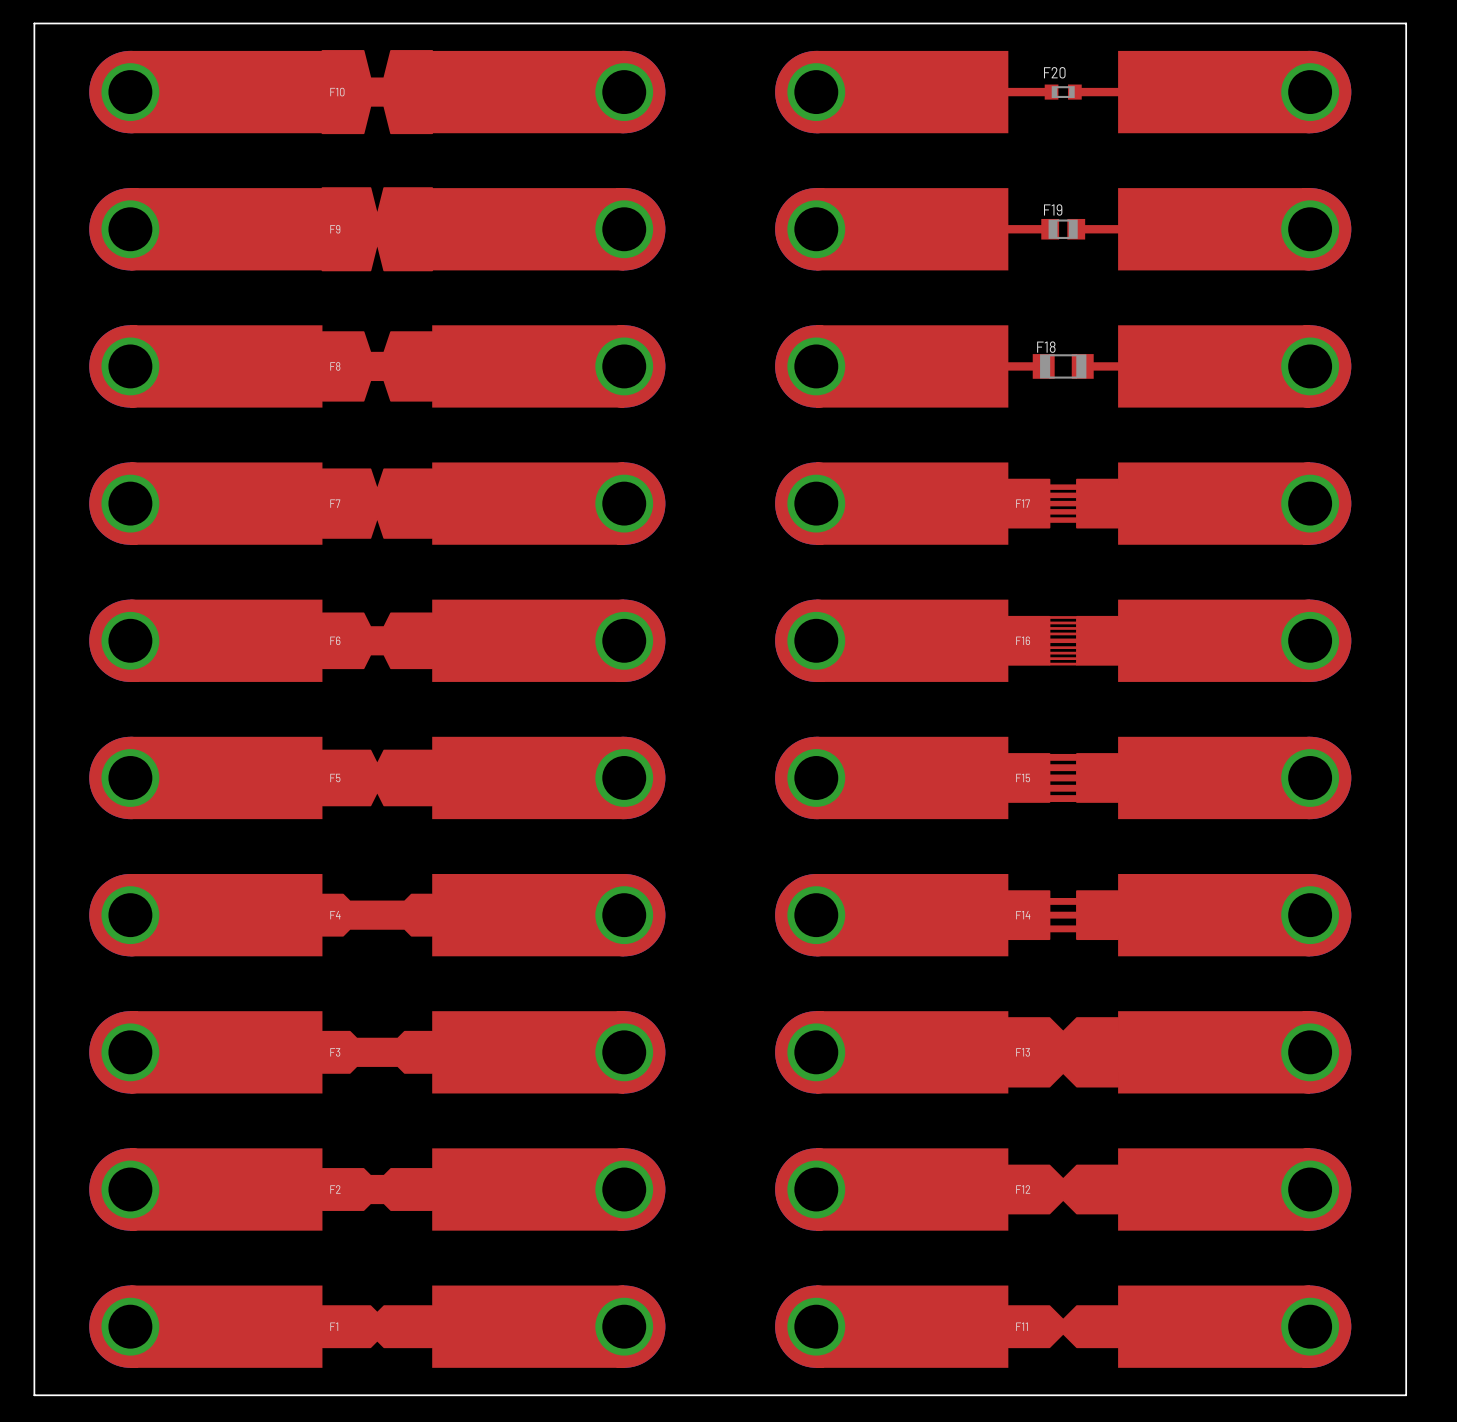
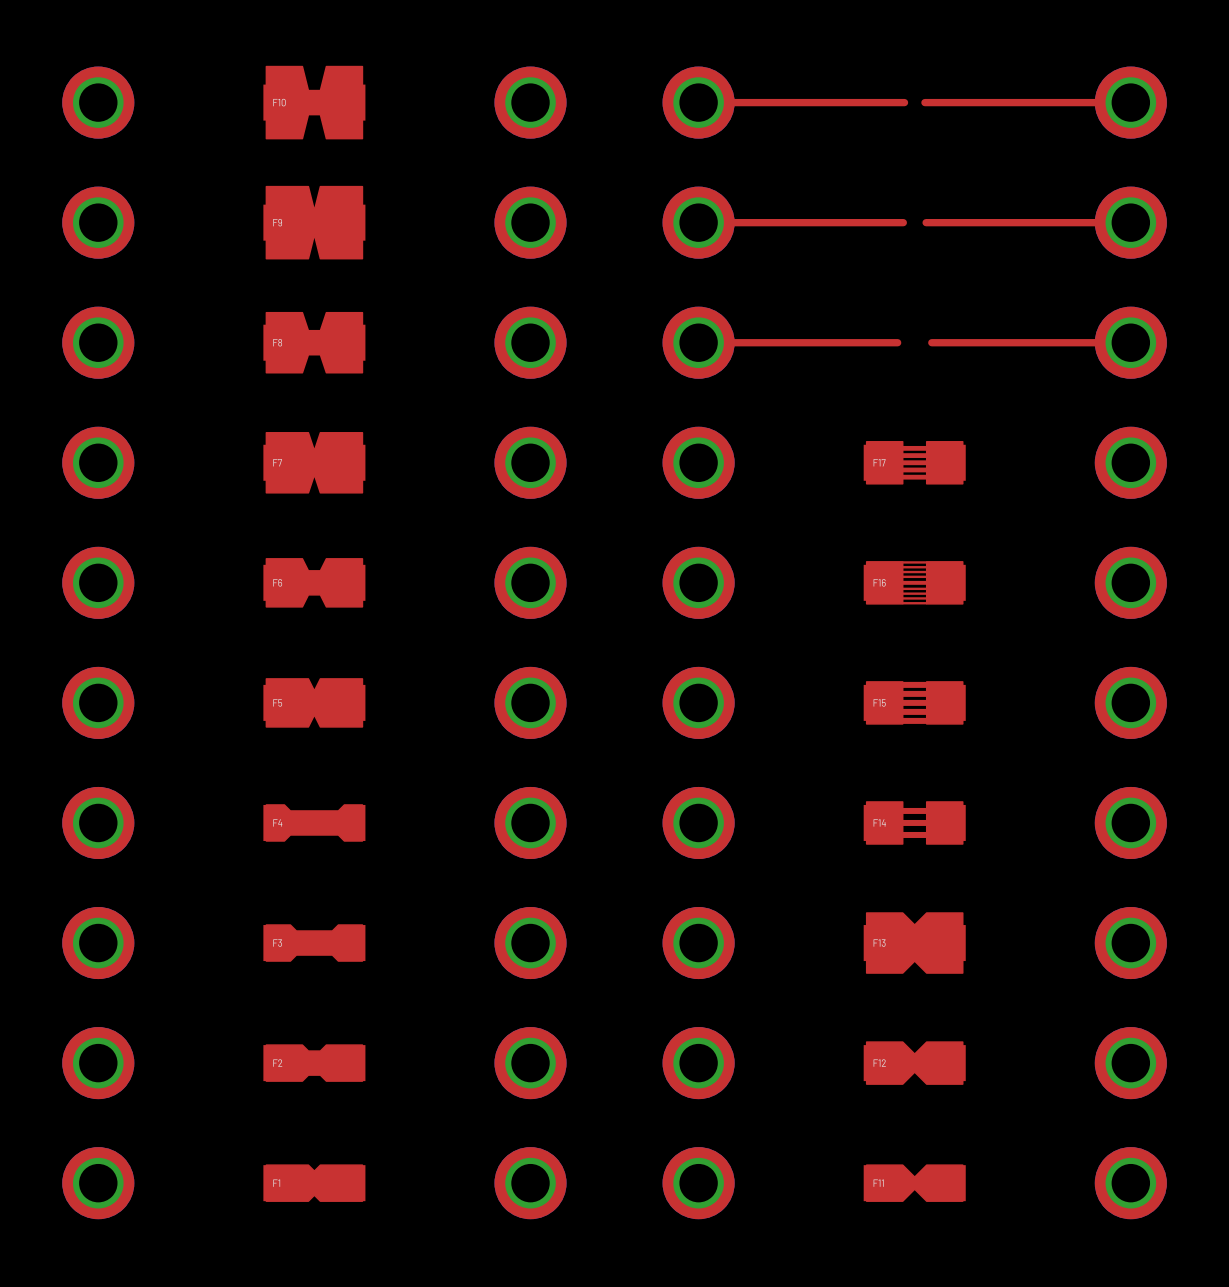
board edge: (34, 23) (1406, 23) (1406, 1395) (34, 1395) (34, 23) -> none
drawing: [130, 50, 323, 134] -> none
drawing: [432, 50, 625, 134] -> none
drawing: [816, 50, 1009, 134] -> none
drawing: [1118, 50, 1311, 134] -> none
F20: (1063, 92) -> none
drawing: [130, 188, 323, 271] -> none
drawing: [432, 188, 625, 271] -> none
drawing: [816, 188, 1009, 271] -> none
drawing: [1118, 188, 1311, 271] -> none
F19: (1063, 229) -> none
drawing: [130, 325, 323, 408] -> none
drawing: [432, 325, 625, 408] -> none
drawing: [816, 325, 1009, 408] -> none
drawing: [1118, 325, 1311, 408] -> none
F18: (1063, 366) -> none
drawing: [130, 462, 323, 545] -> none
drawing: [432, 462, 625, 545] -> none
drawing: [816, 462, 1009, 545] -> none
drawing: [1118, 462, 1311, 545] -> none
drawing: [130, 599, 323, 682] -> none
drawing: [432, 599, 625, 682] -> none
drawing: [816, 599, 1009, 682] -> none
drawing: [1118, 599, 1311, 682] -> none
drawing: [130, 736, 323, 820] -> none
drawing: [432, 736, 625, 820] -> none
drawing: [816, 736, 1009, 820] -> none
drawing: [1118, 736, 1311, 820] -> none
drawing: [130, 873, 323, 957] -> none
drawing: [432, 873, 625, 957] -> none
drawing: [816, 873, 1009, 957] -> none
drawing: [1118, 873, 1311, 957] -> none
drawing: [130, 1011, 323, 1094] -> none
drawing: [432, 1011, 625, 1094] -> none
drawing: [816, 1011, 1009, 1094] -> none
drawing: [1118, 1011, 1311, 1094] -> none
drawing: [130, 1148, 323, 1231] -> none
drawing: [432, 1148, 625, 1231] -> none
drawing: [816, 1148, 1009, 1231] -> none
drawing: [1118, 1148, 1311, 1231] -> none
drawing: [130, 1285, 323, 1368] -> none
drawing: [432, 1285, 625, 1368] -> none
drawing: [816, 1285, 1009, 1368] -> none
drawing: [1118, 1285, 1311, 1368] -> none

